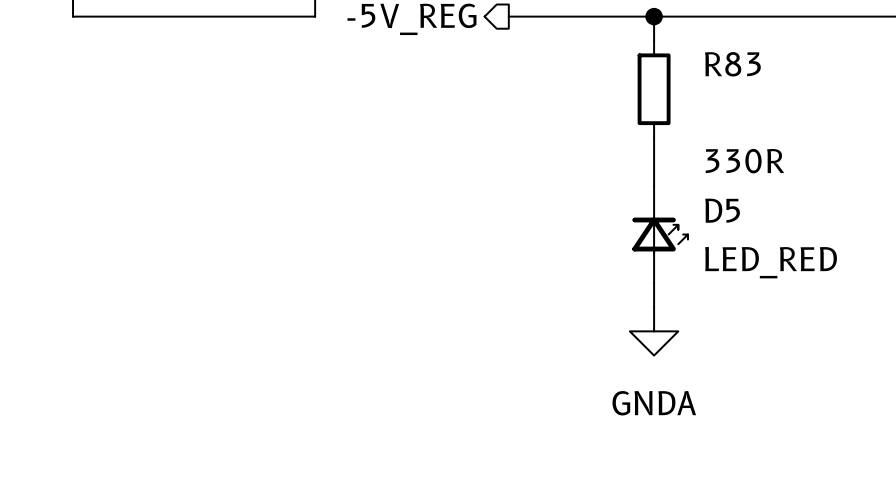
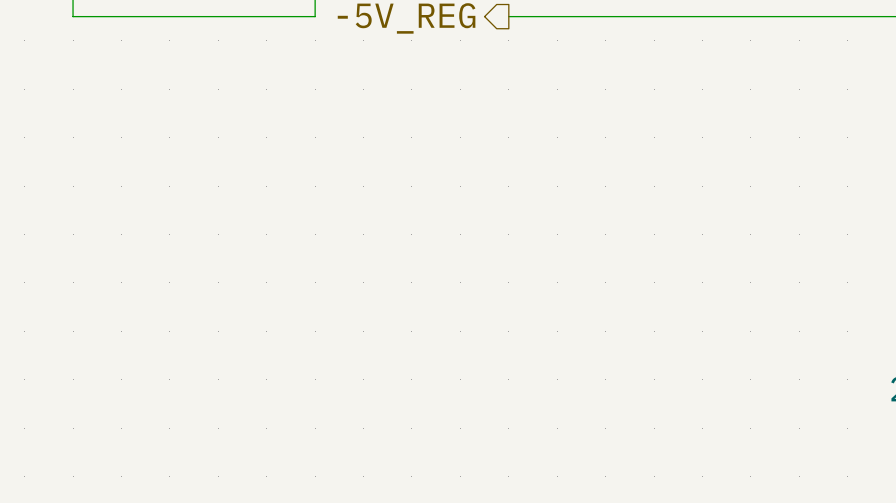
wire: (654, 16) (654, 40) -> none
junction: (654, 16) -> none
R83: 330R (654, 89) -> none
wire: (654, 137) (654, 186) -> none
D5: LED_RED (660, 234) -> none
wire: (654, 282) (654, 307) -> none
power symbol: GNDA (654, 331) -> none

